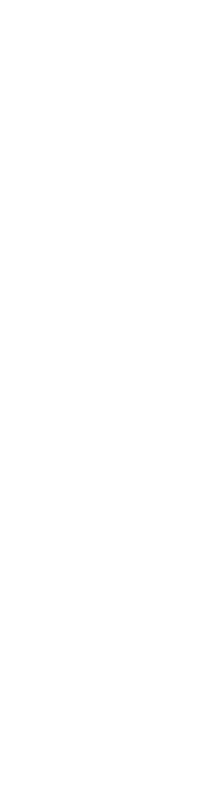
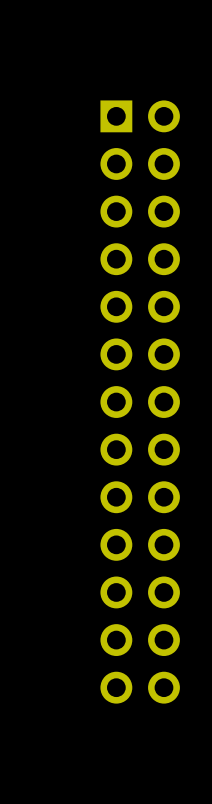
part: none -> (140, 402)

